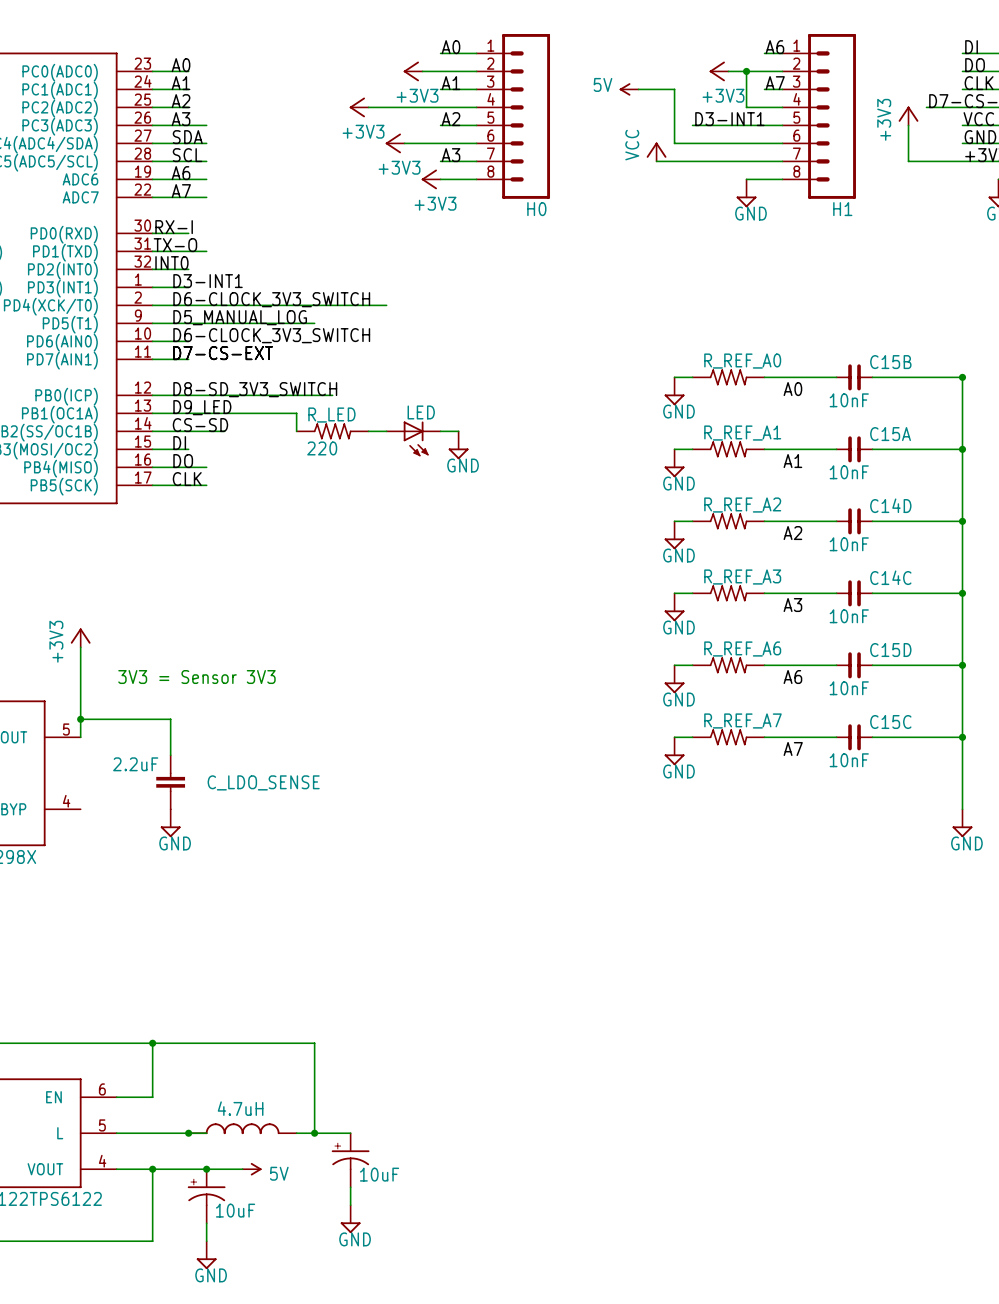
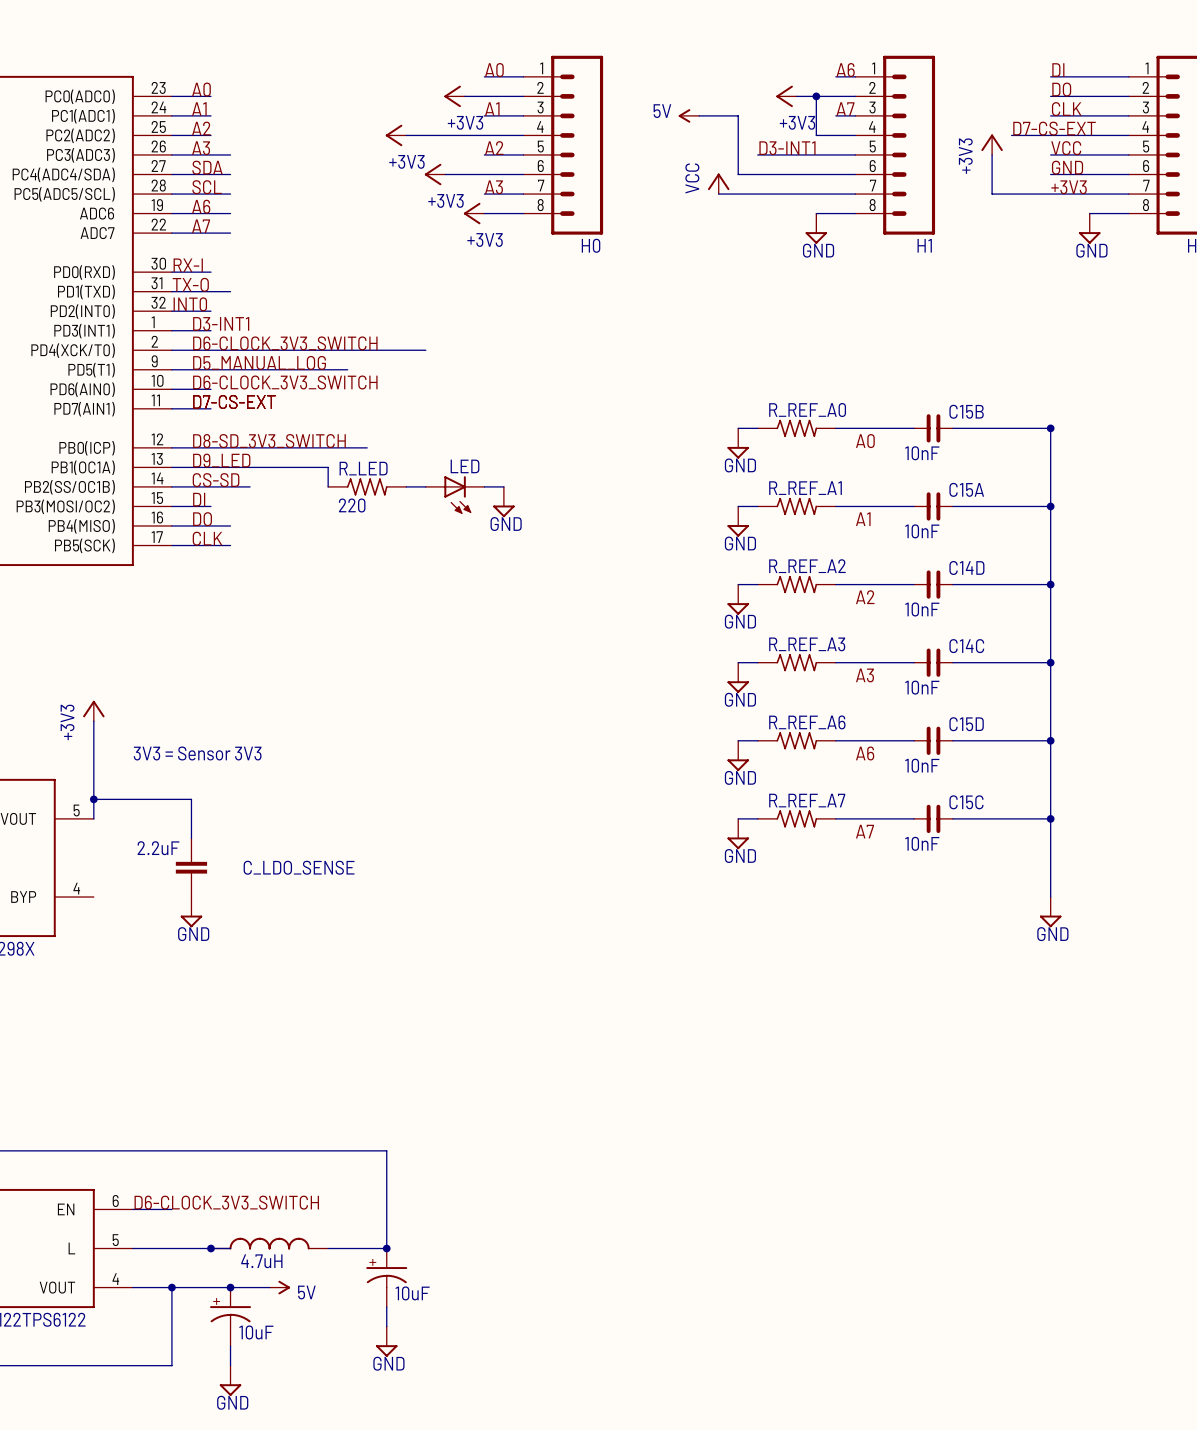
wire: (152, 1043) (152, 1097) -> none
junction: (152, 1043) -> none
wire: (314, 1043) (314, 1133) -> (347, 1150) (386, 1150) (386, 1248)
label: none -> D6-CLOCK_3V3_SWITCH (226, 1202)
part value position: 4.7uH (240, 1108) -> 4.7uH (261, 1261)
junction position: (314, 1133) -> (386, 1248)

